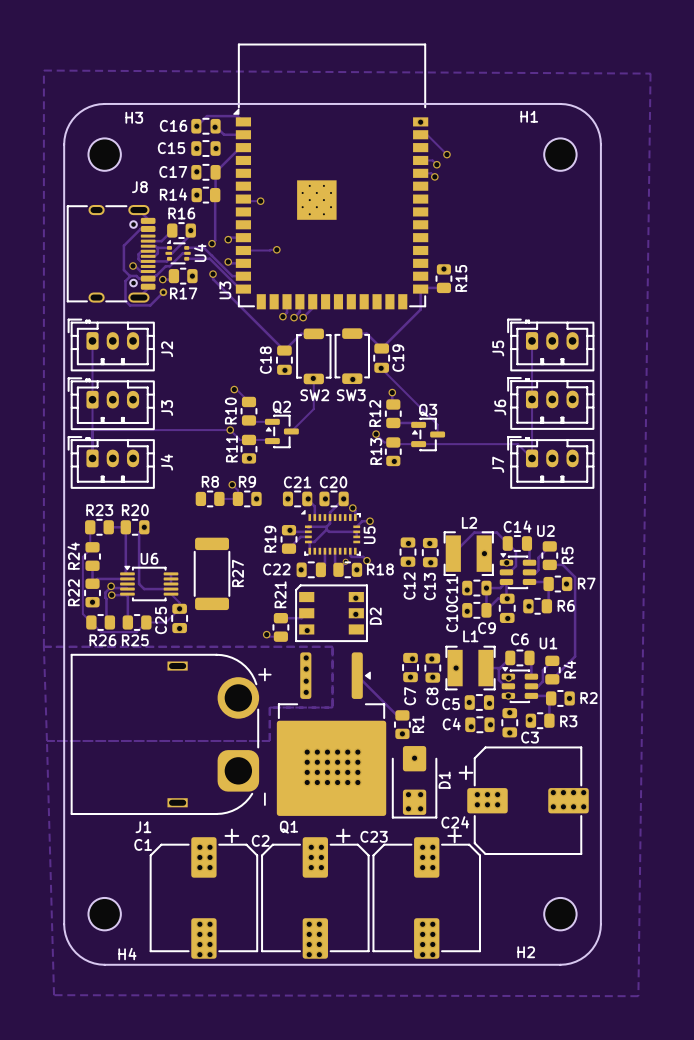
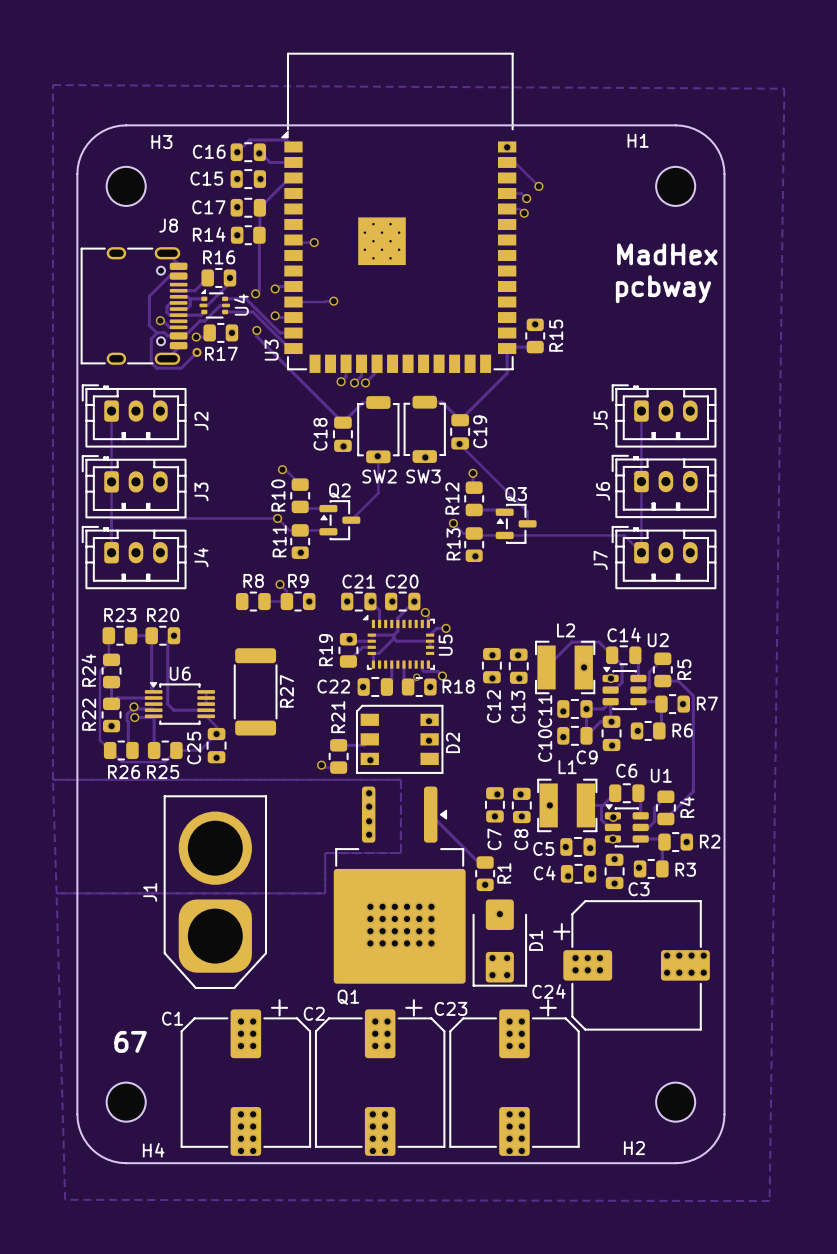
text: none -> MadHex (667, 254)
text: none -> pcbway (663, 289)
J1 footprint: [71, 654, 260, 815] -> [163, 795, 267, 989]
J1 name position: J1 (143, 827) -> J1 (150, 892)
text: none -> 67 (130, 1041)

